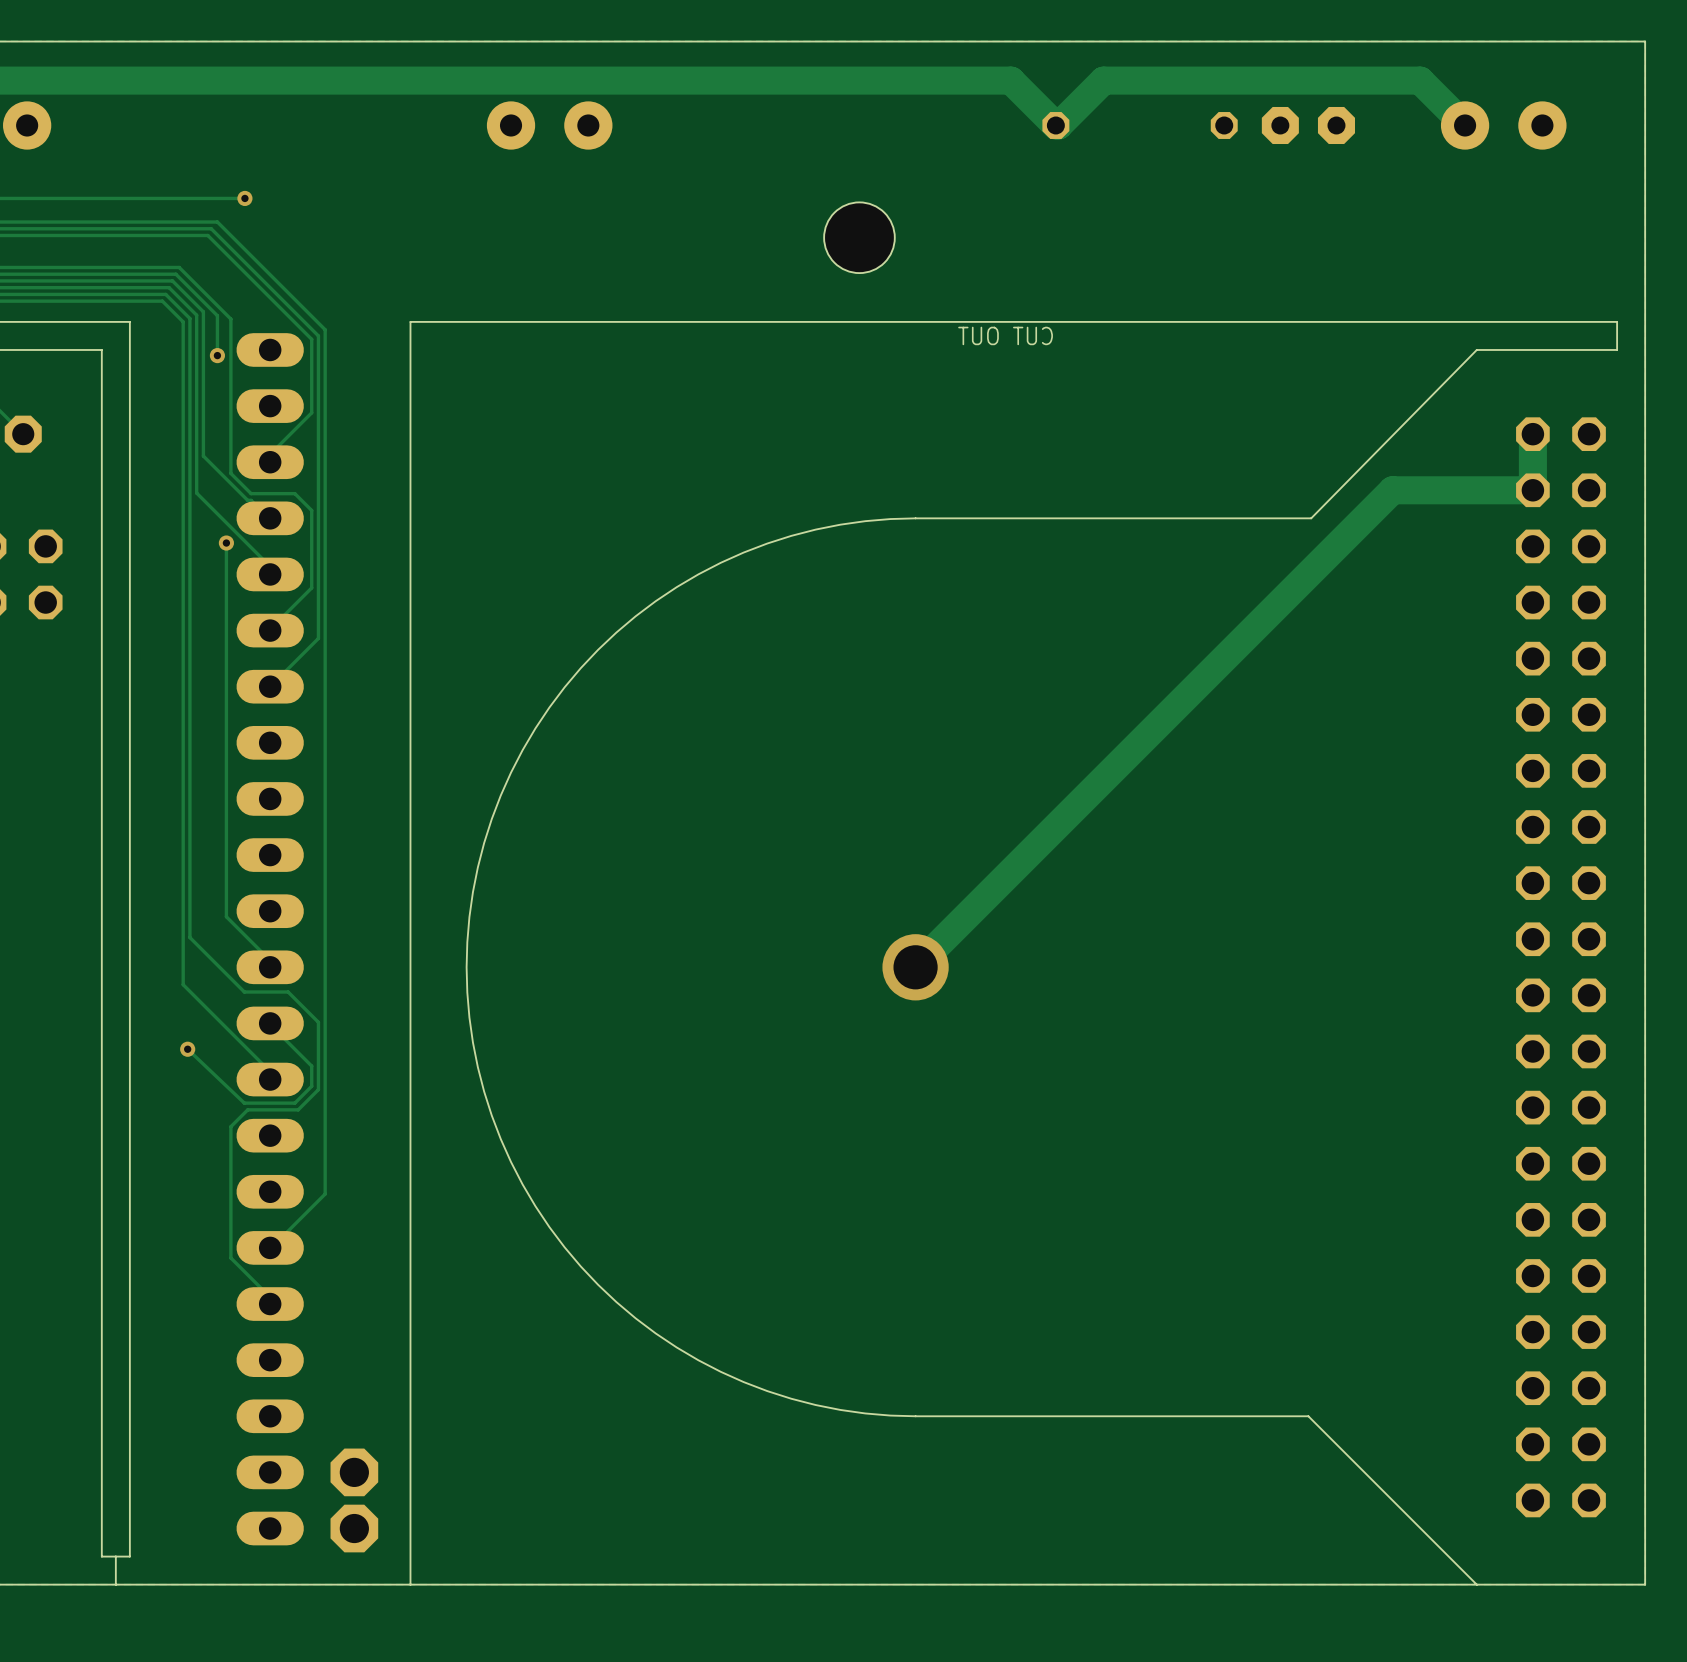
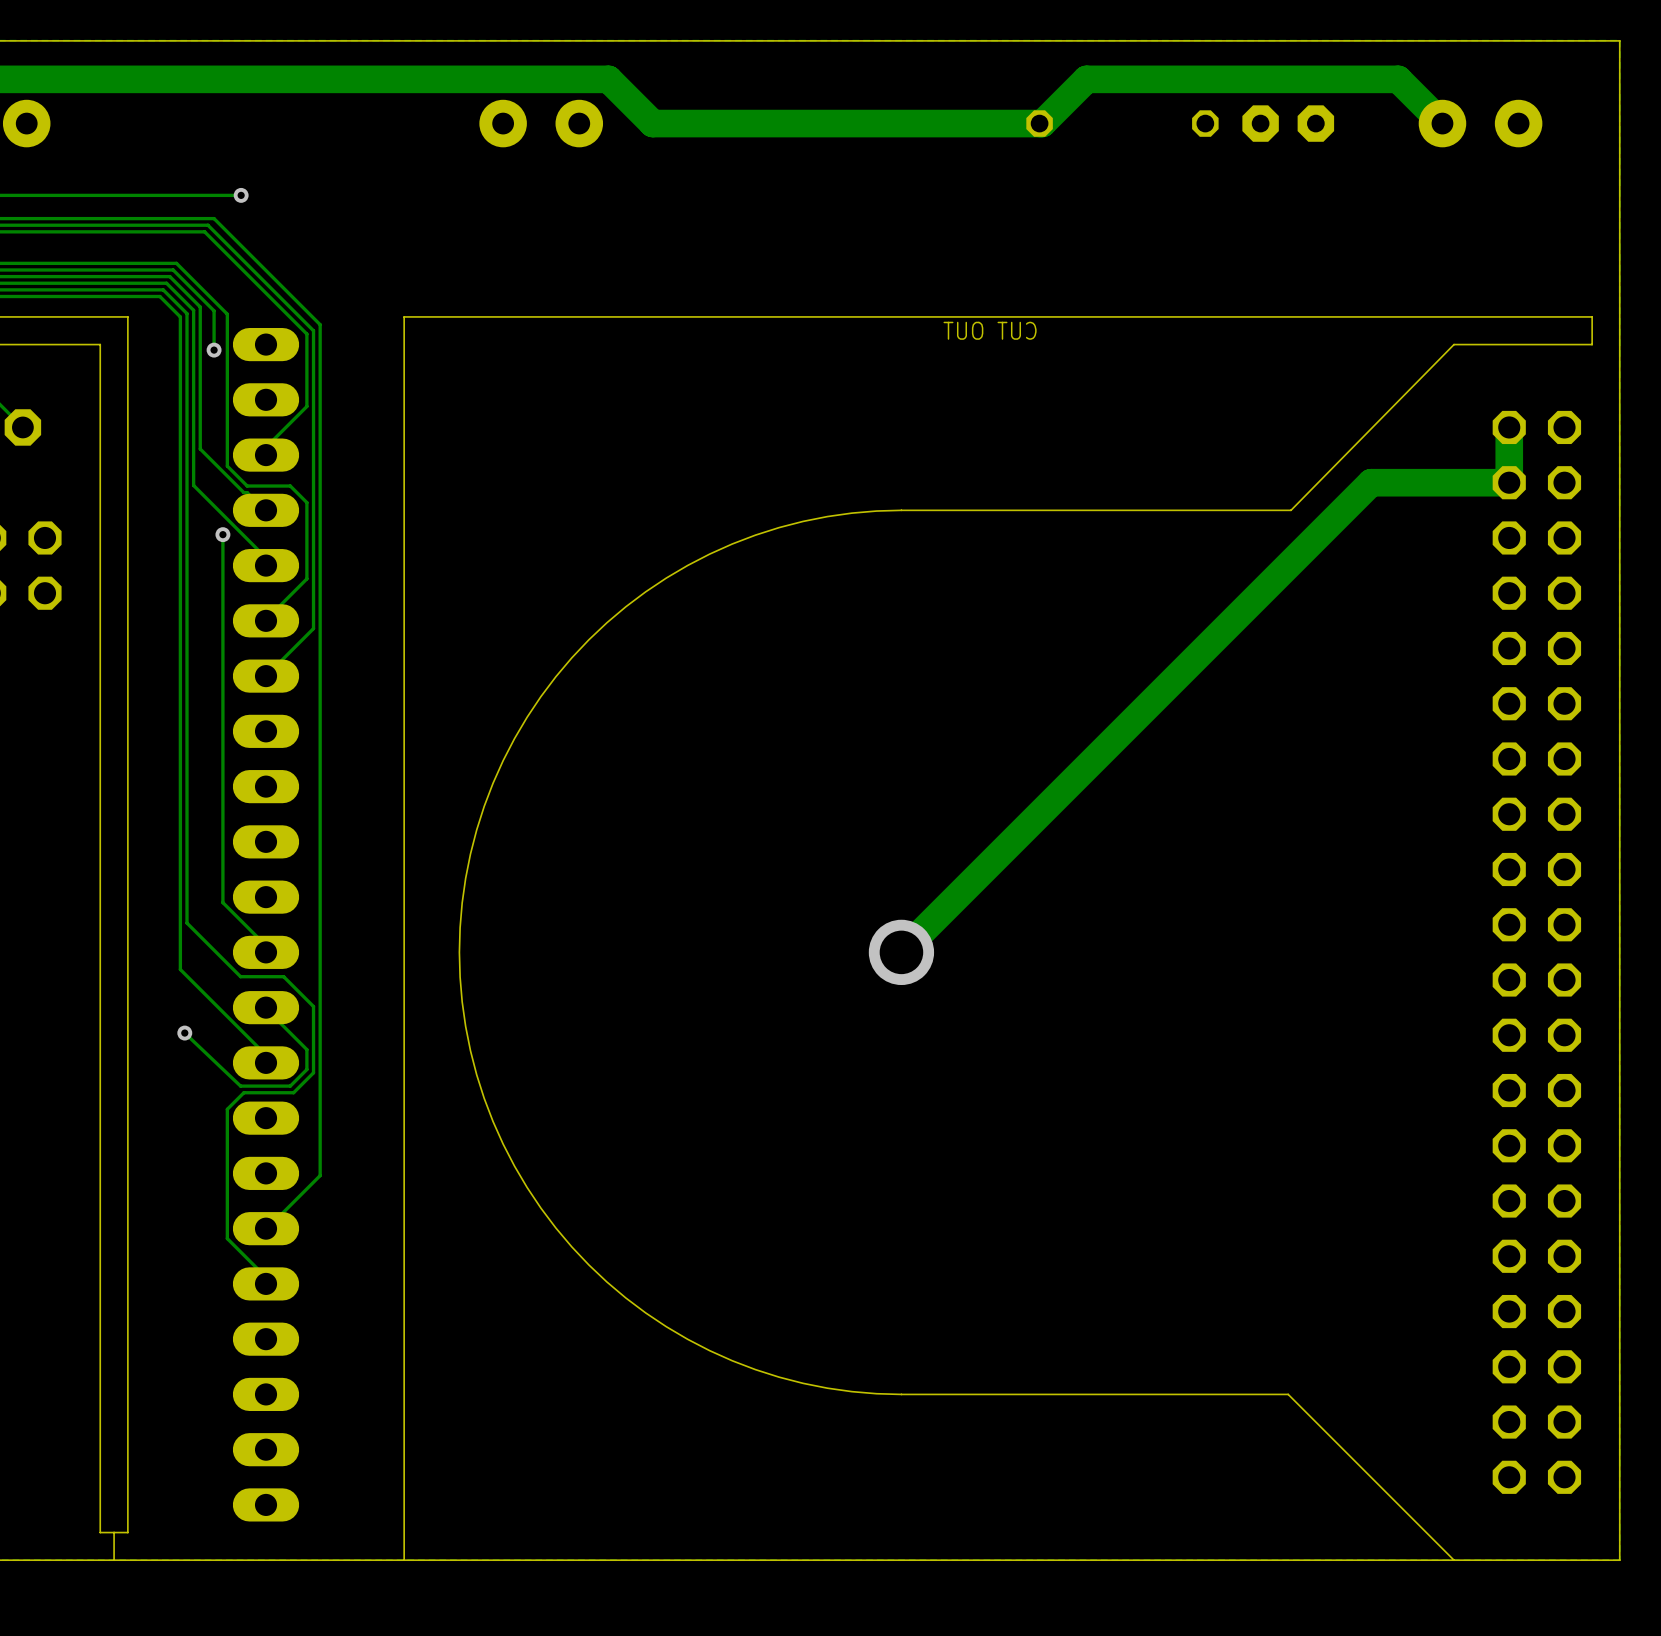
track: (618, 80) (1010, 80) (1055, 125) -> (608, 79) (652, 123) (1039, 123)
hole: (859, 237) -> none
part: (354, 1472) -> none
part: (354, 1528) -> none

